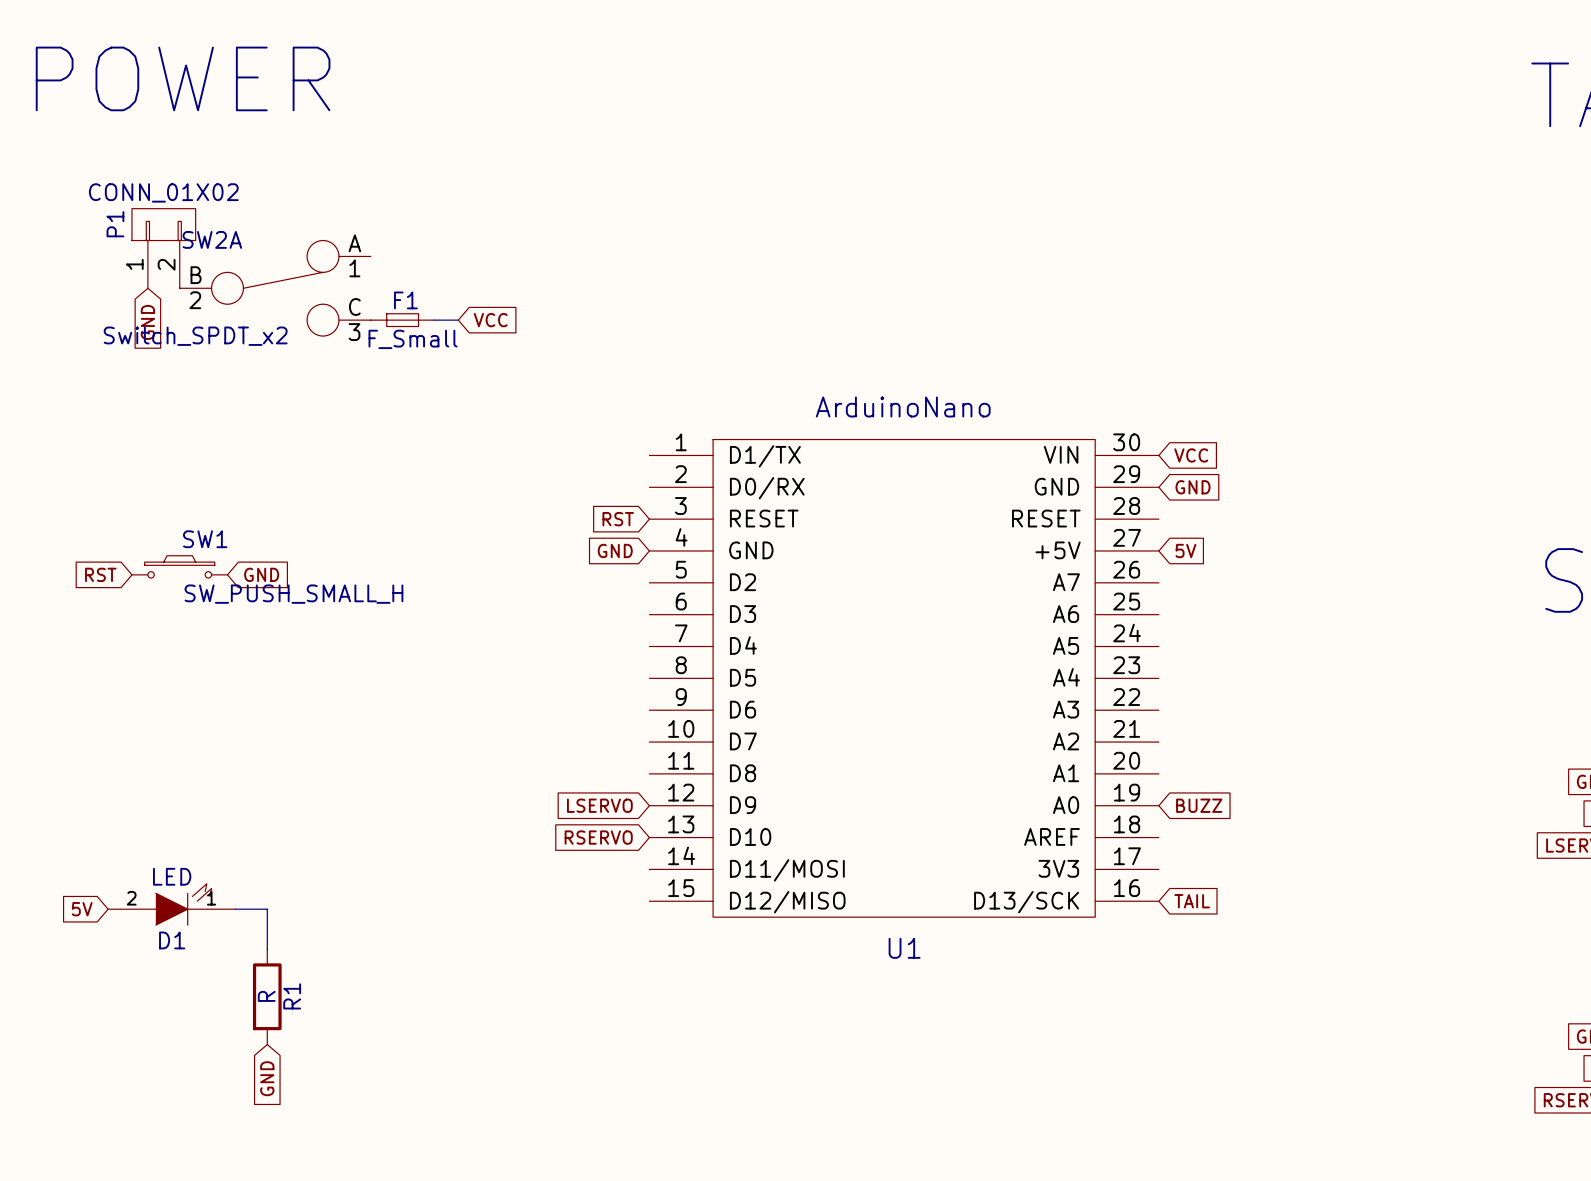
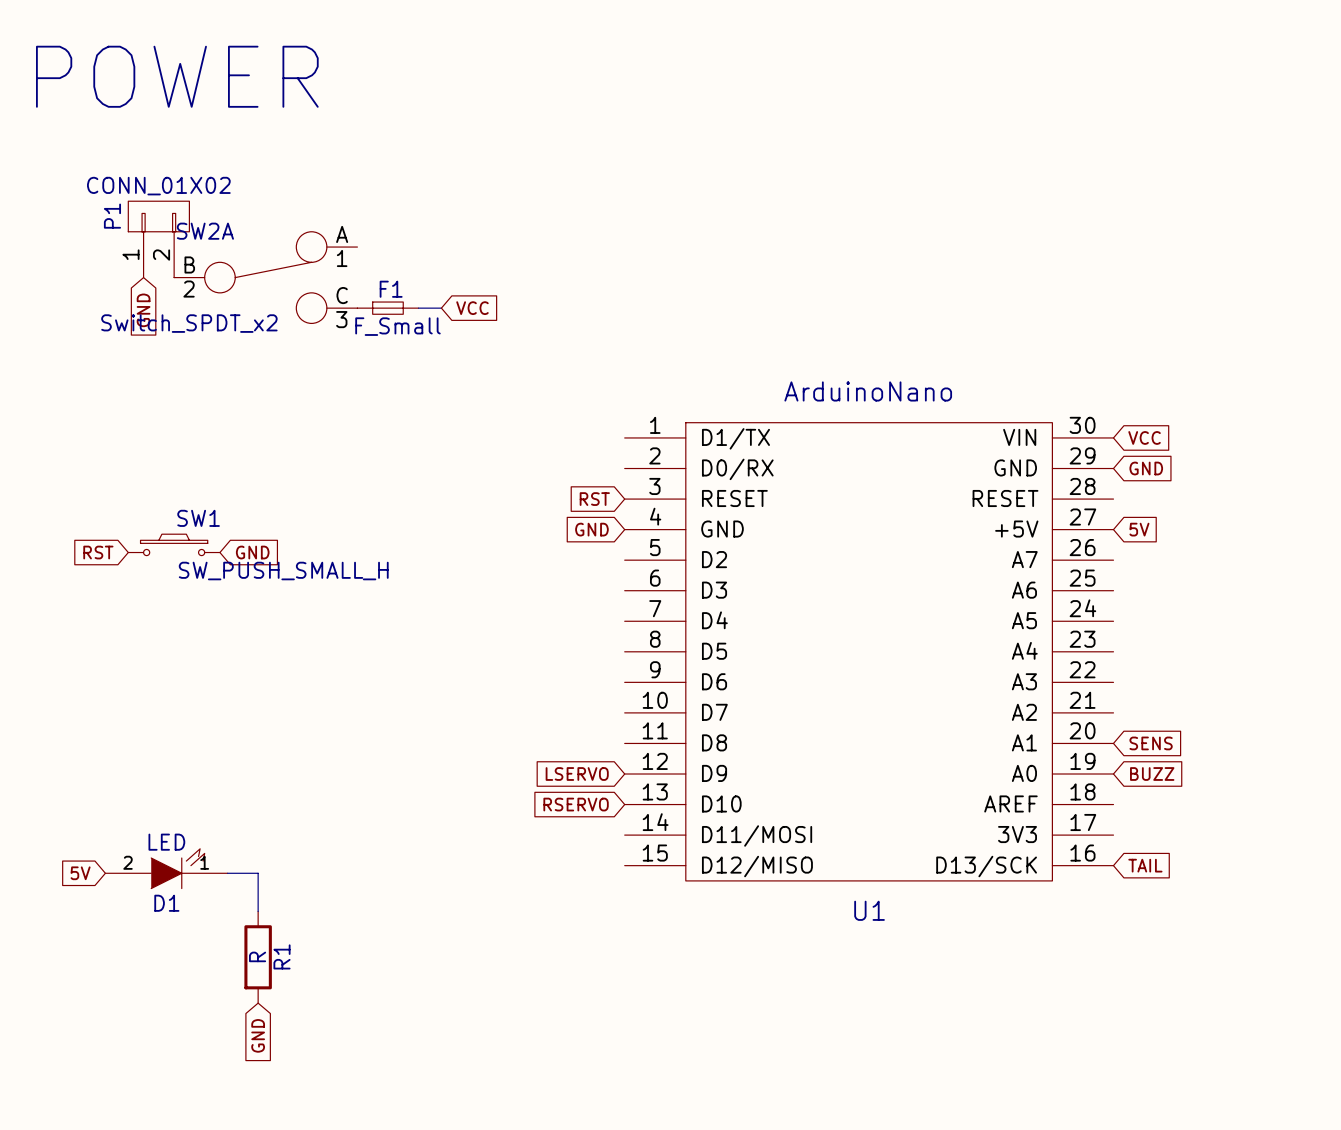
global label: none -> SENS (1151, 743)

